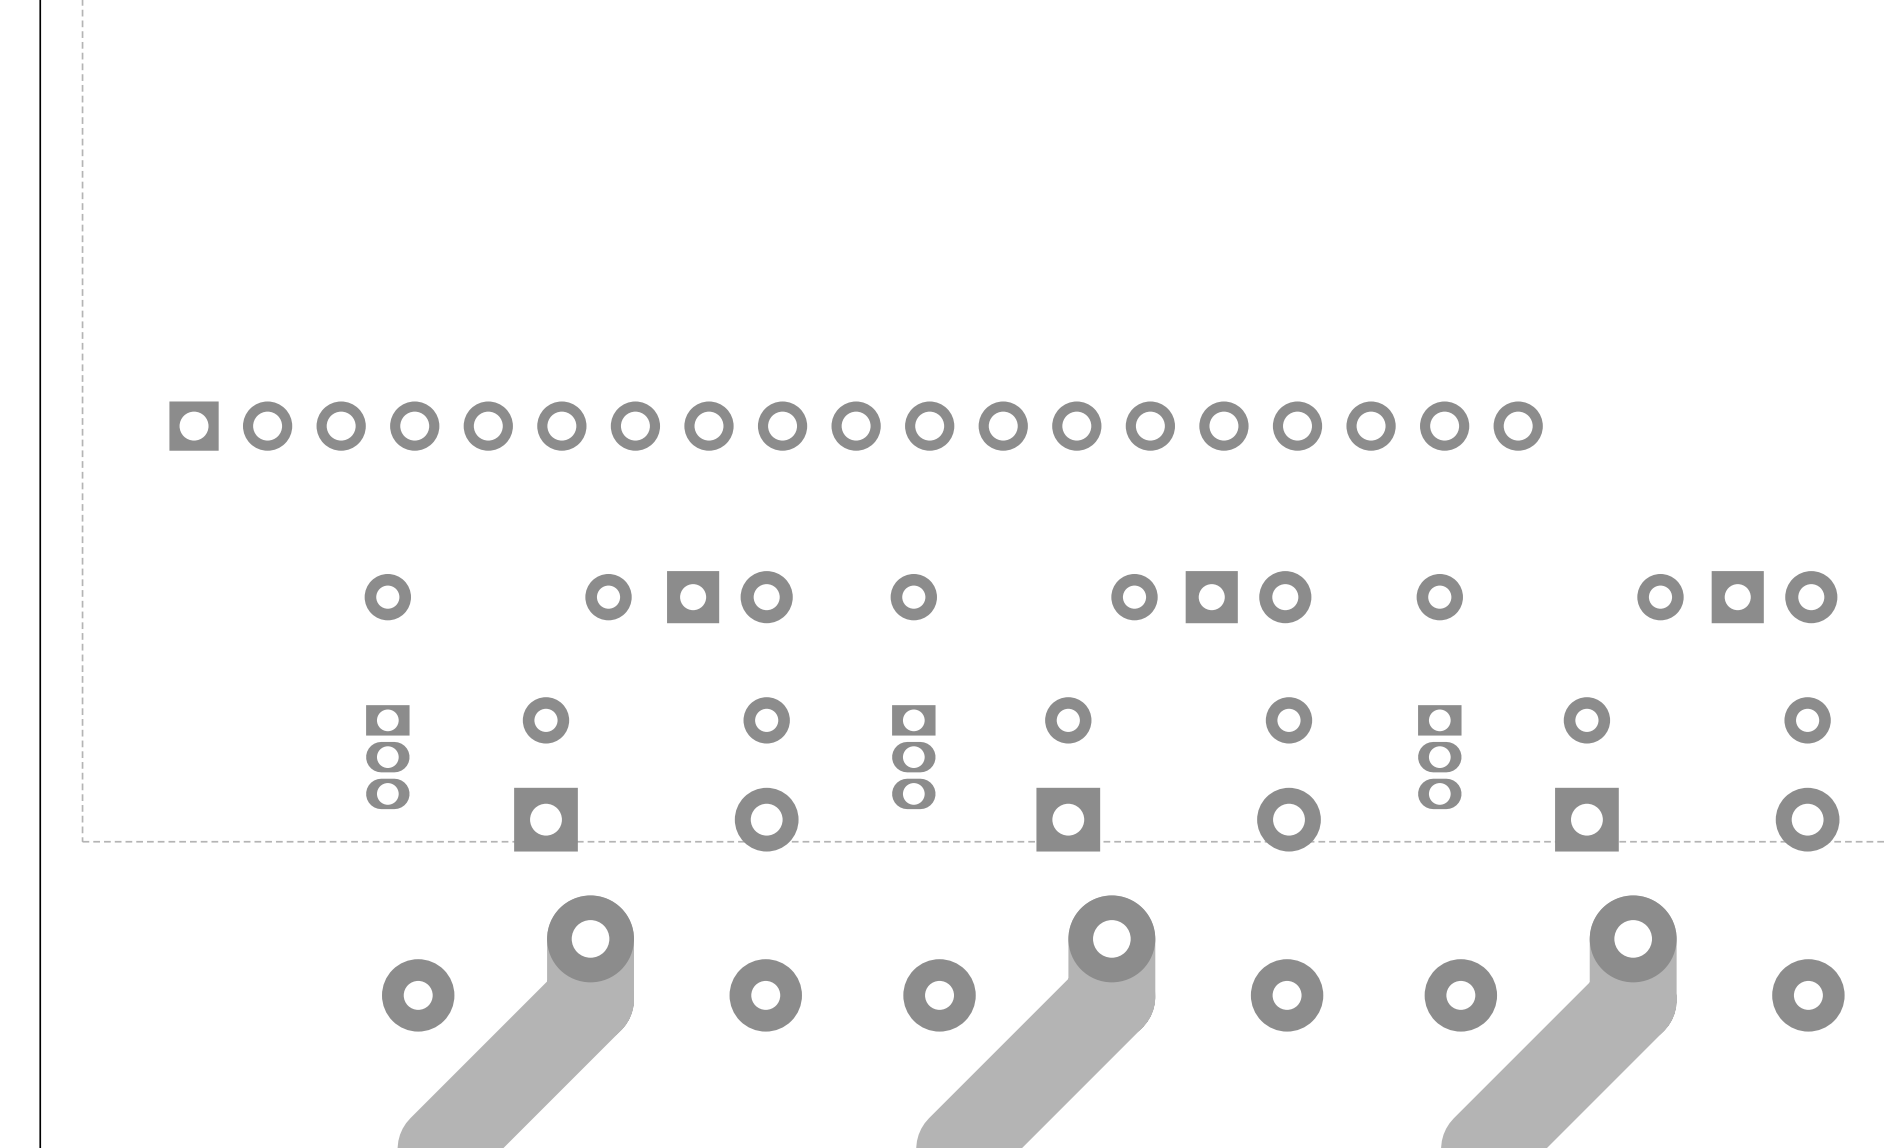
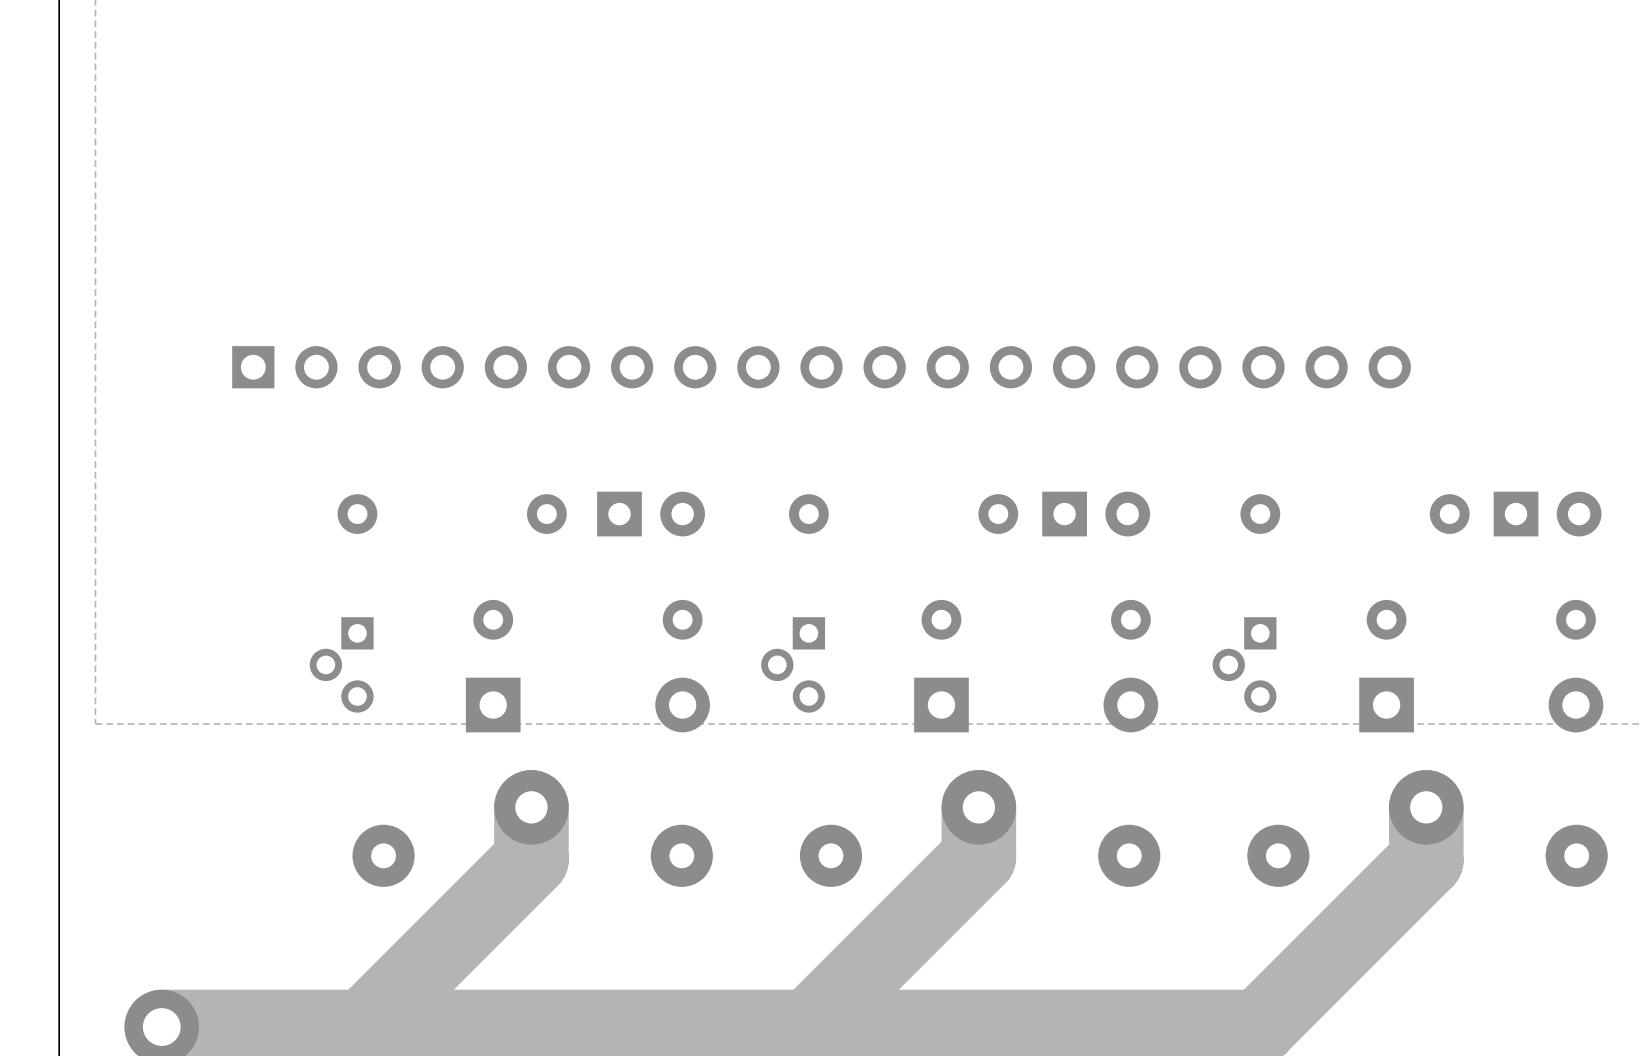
part position: (856, 426) -> (821, 367)
part footprint: [366, 705, 410, 810] -> [309, 617, 374, 713]
part footprint: [892, 705, 936, 810] -> [761, 617, 826, 713]
part footprint: [1418, 705, 1462, 810] -> [1212, 617, 1277, 713]

